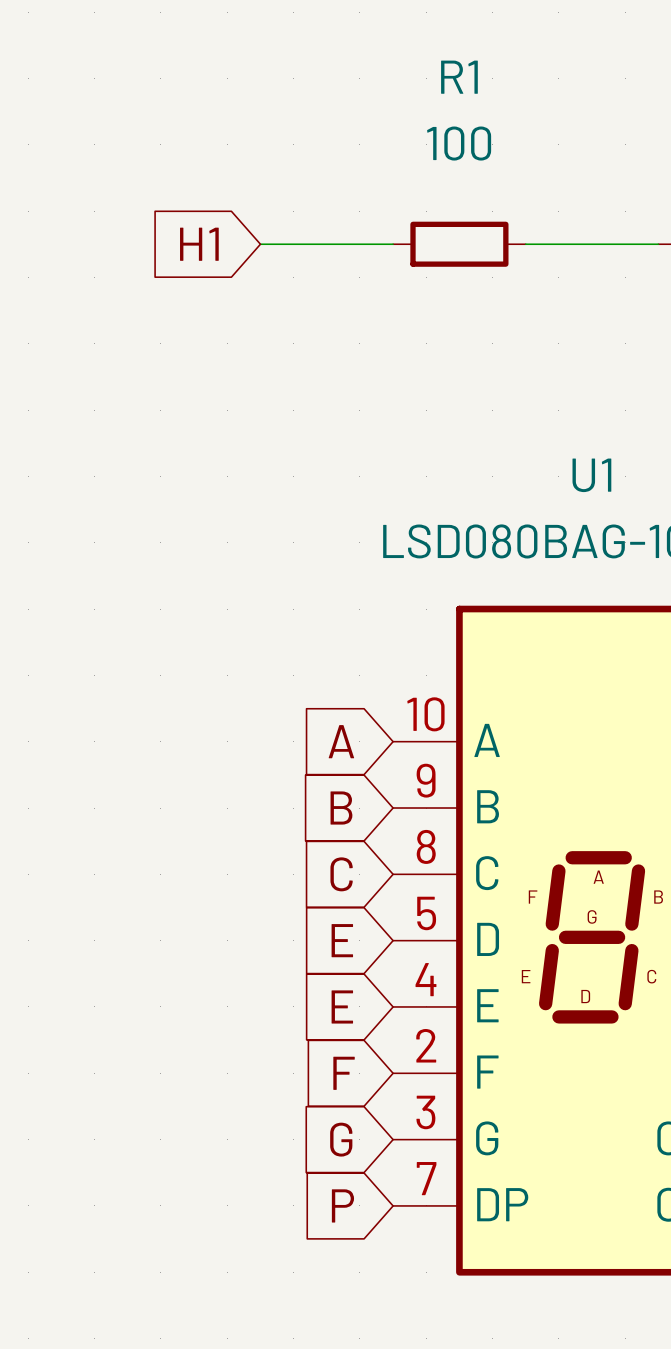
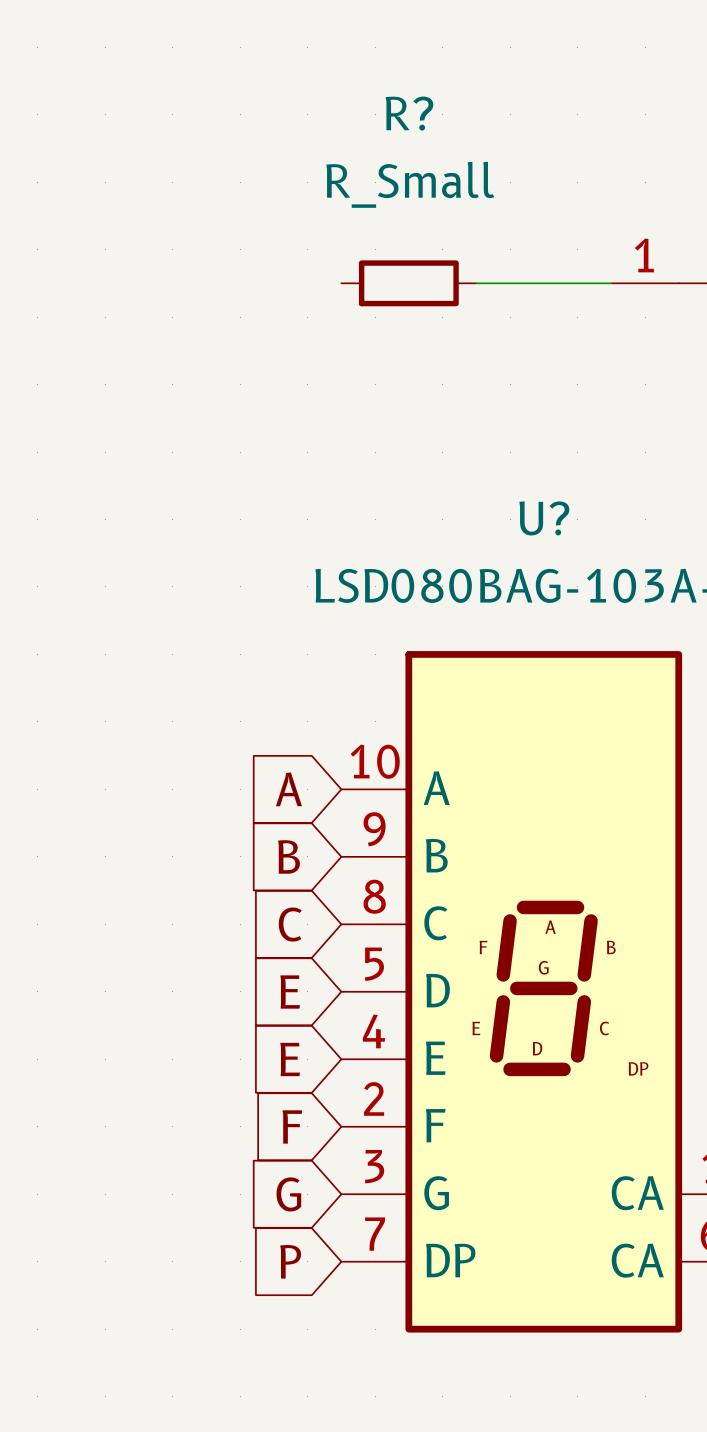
R1 name: R1 (459, 77) -> R? (409, 113)
R1 value: 100 (459, 143) -> R_Small (410, 184)
global label: H1 (199, 244) -> none
wire: (260, 244) (393, 244) -> none
U1 name: U1 (591, 475) -> U? (544, 518)

